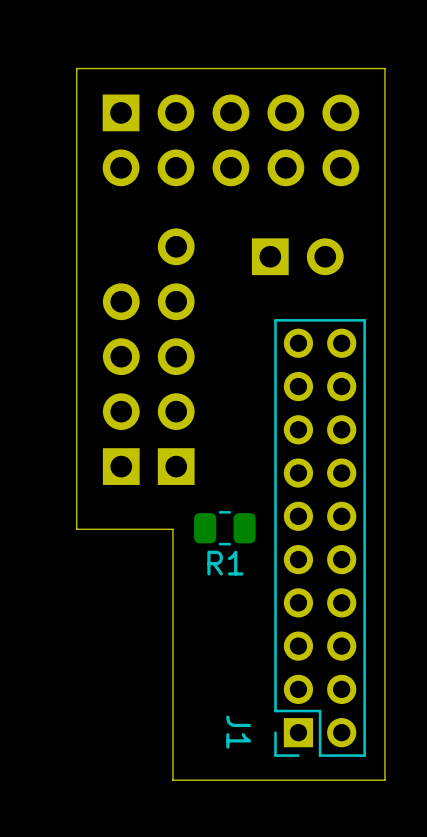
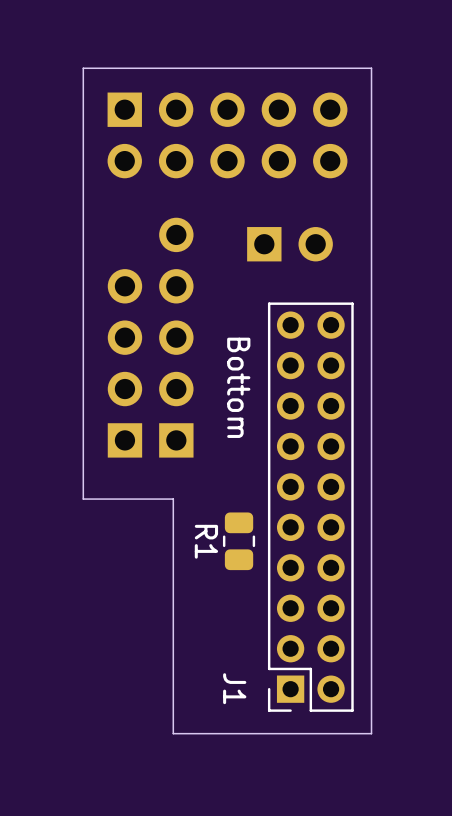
text: none -> Bottom (238, 387)
R1 rotation: 0° (224, 528) -> 90° clockwise (239, 541)
R1 position: (224, 528) -> (239, 541)

